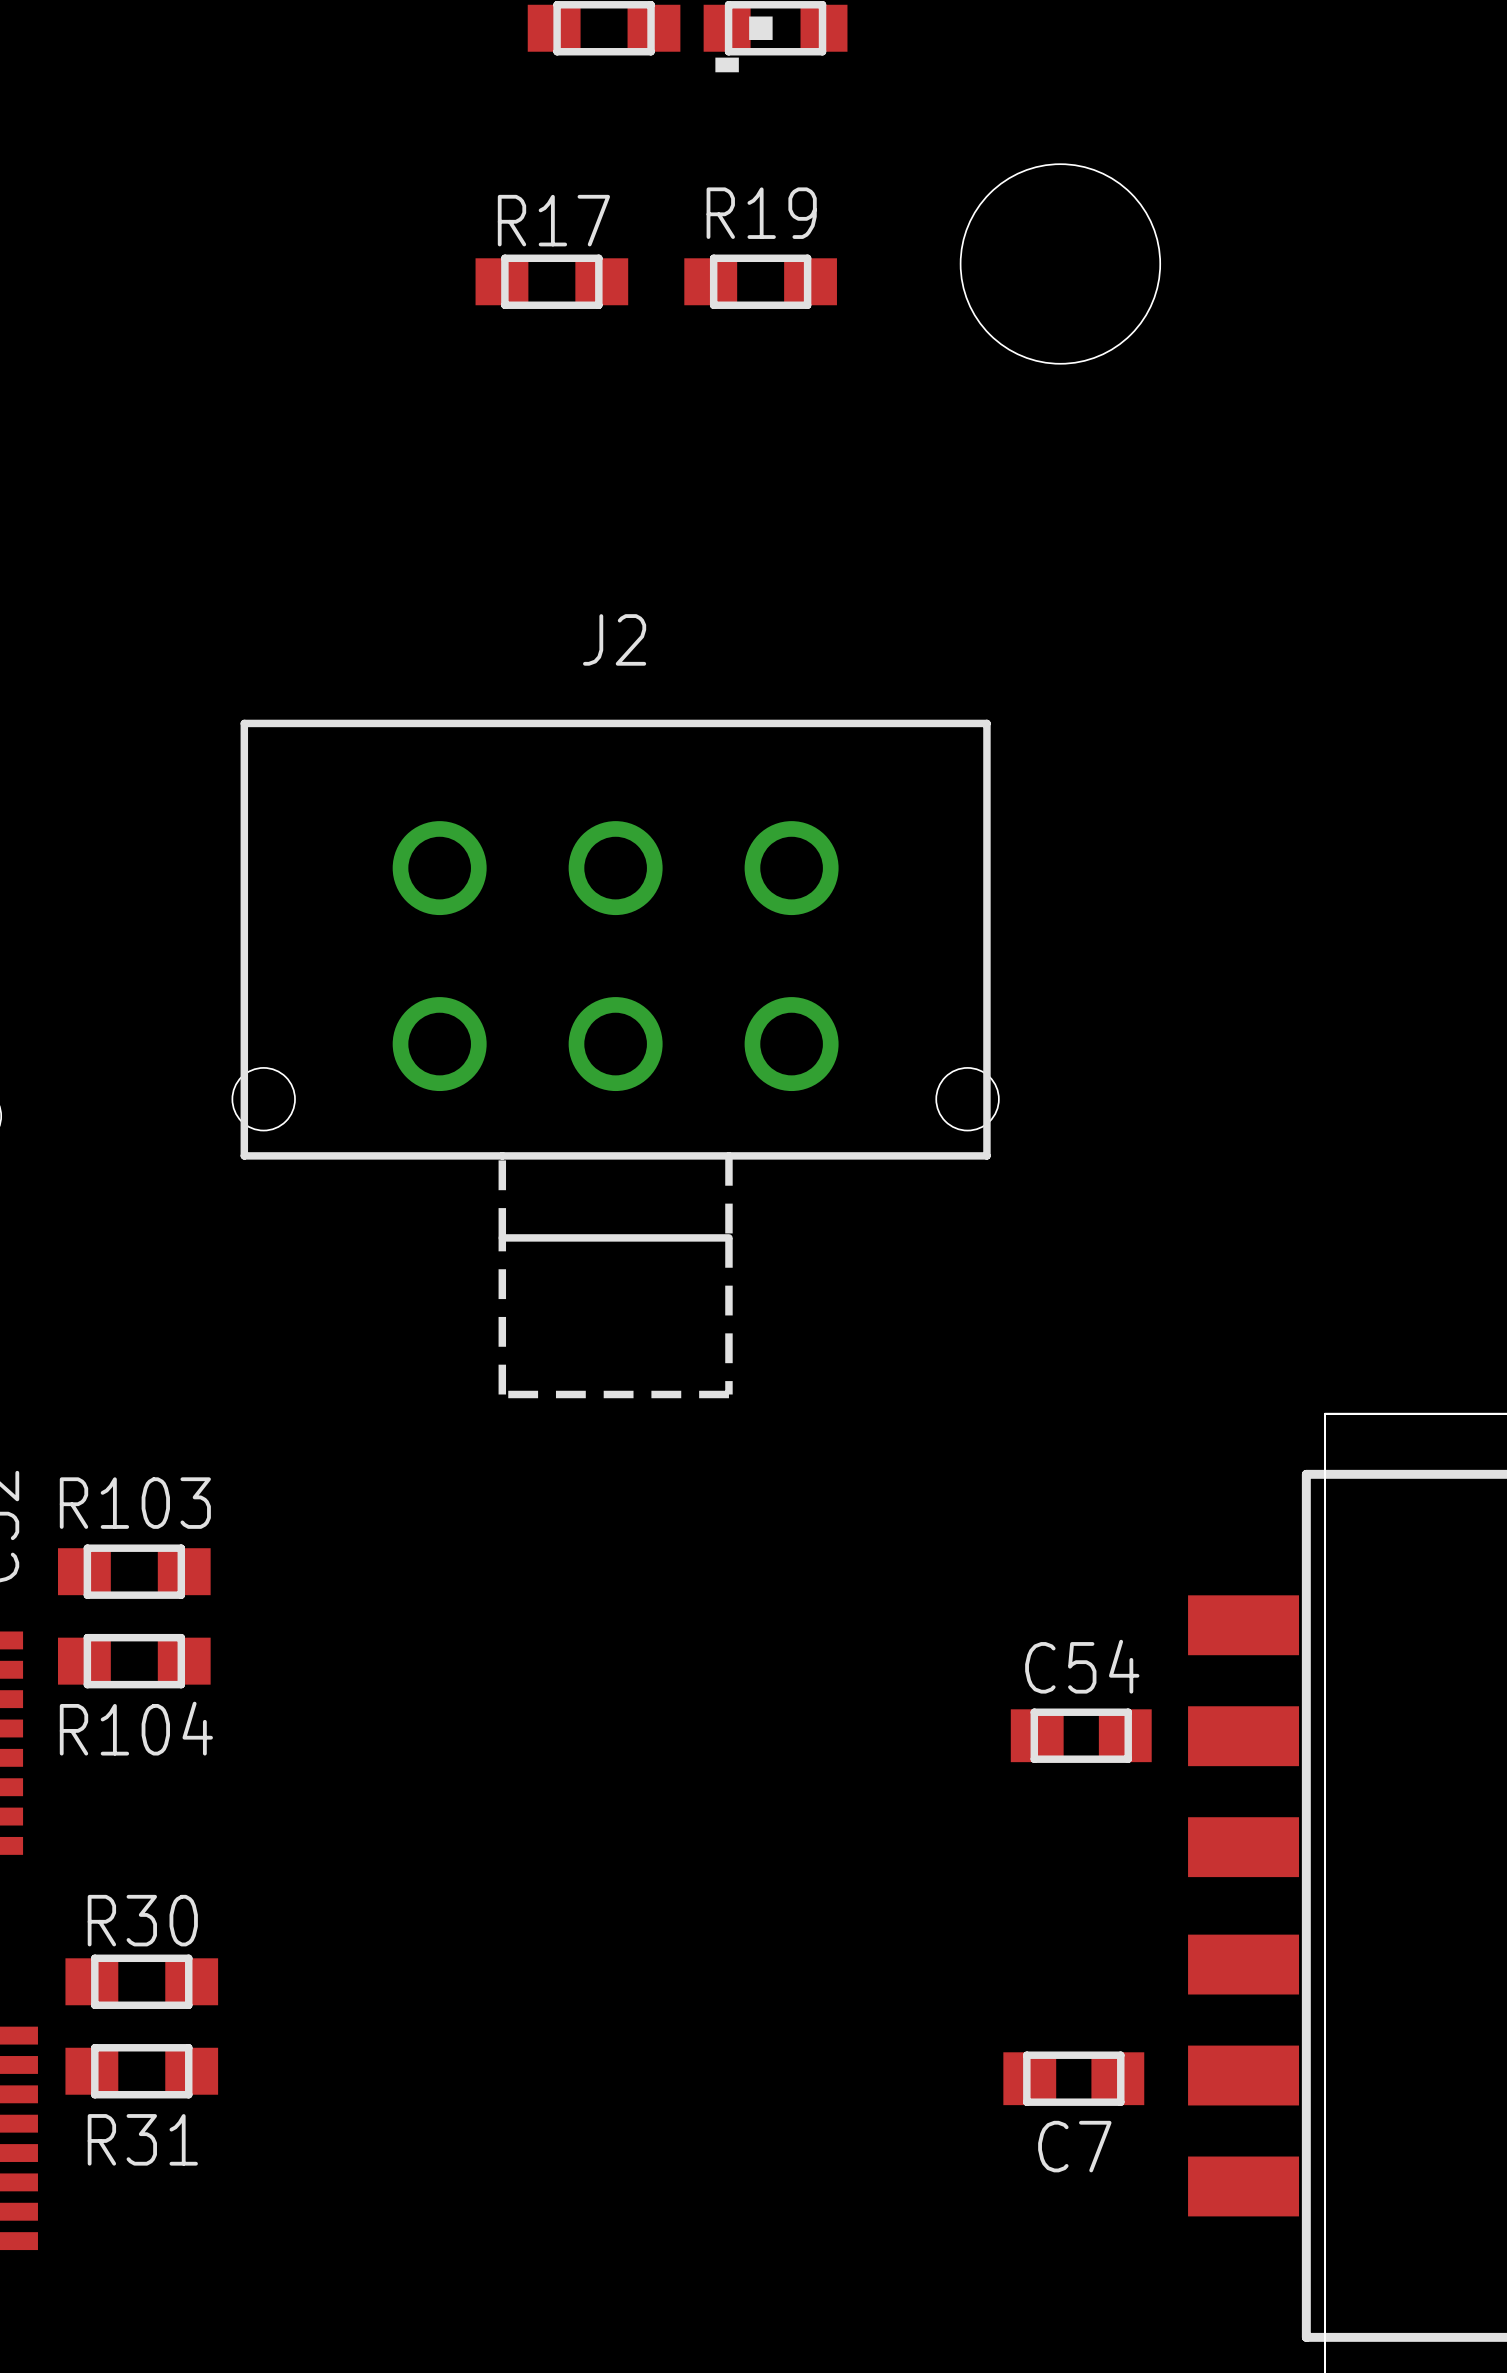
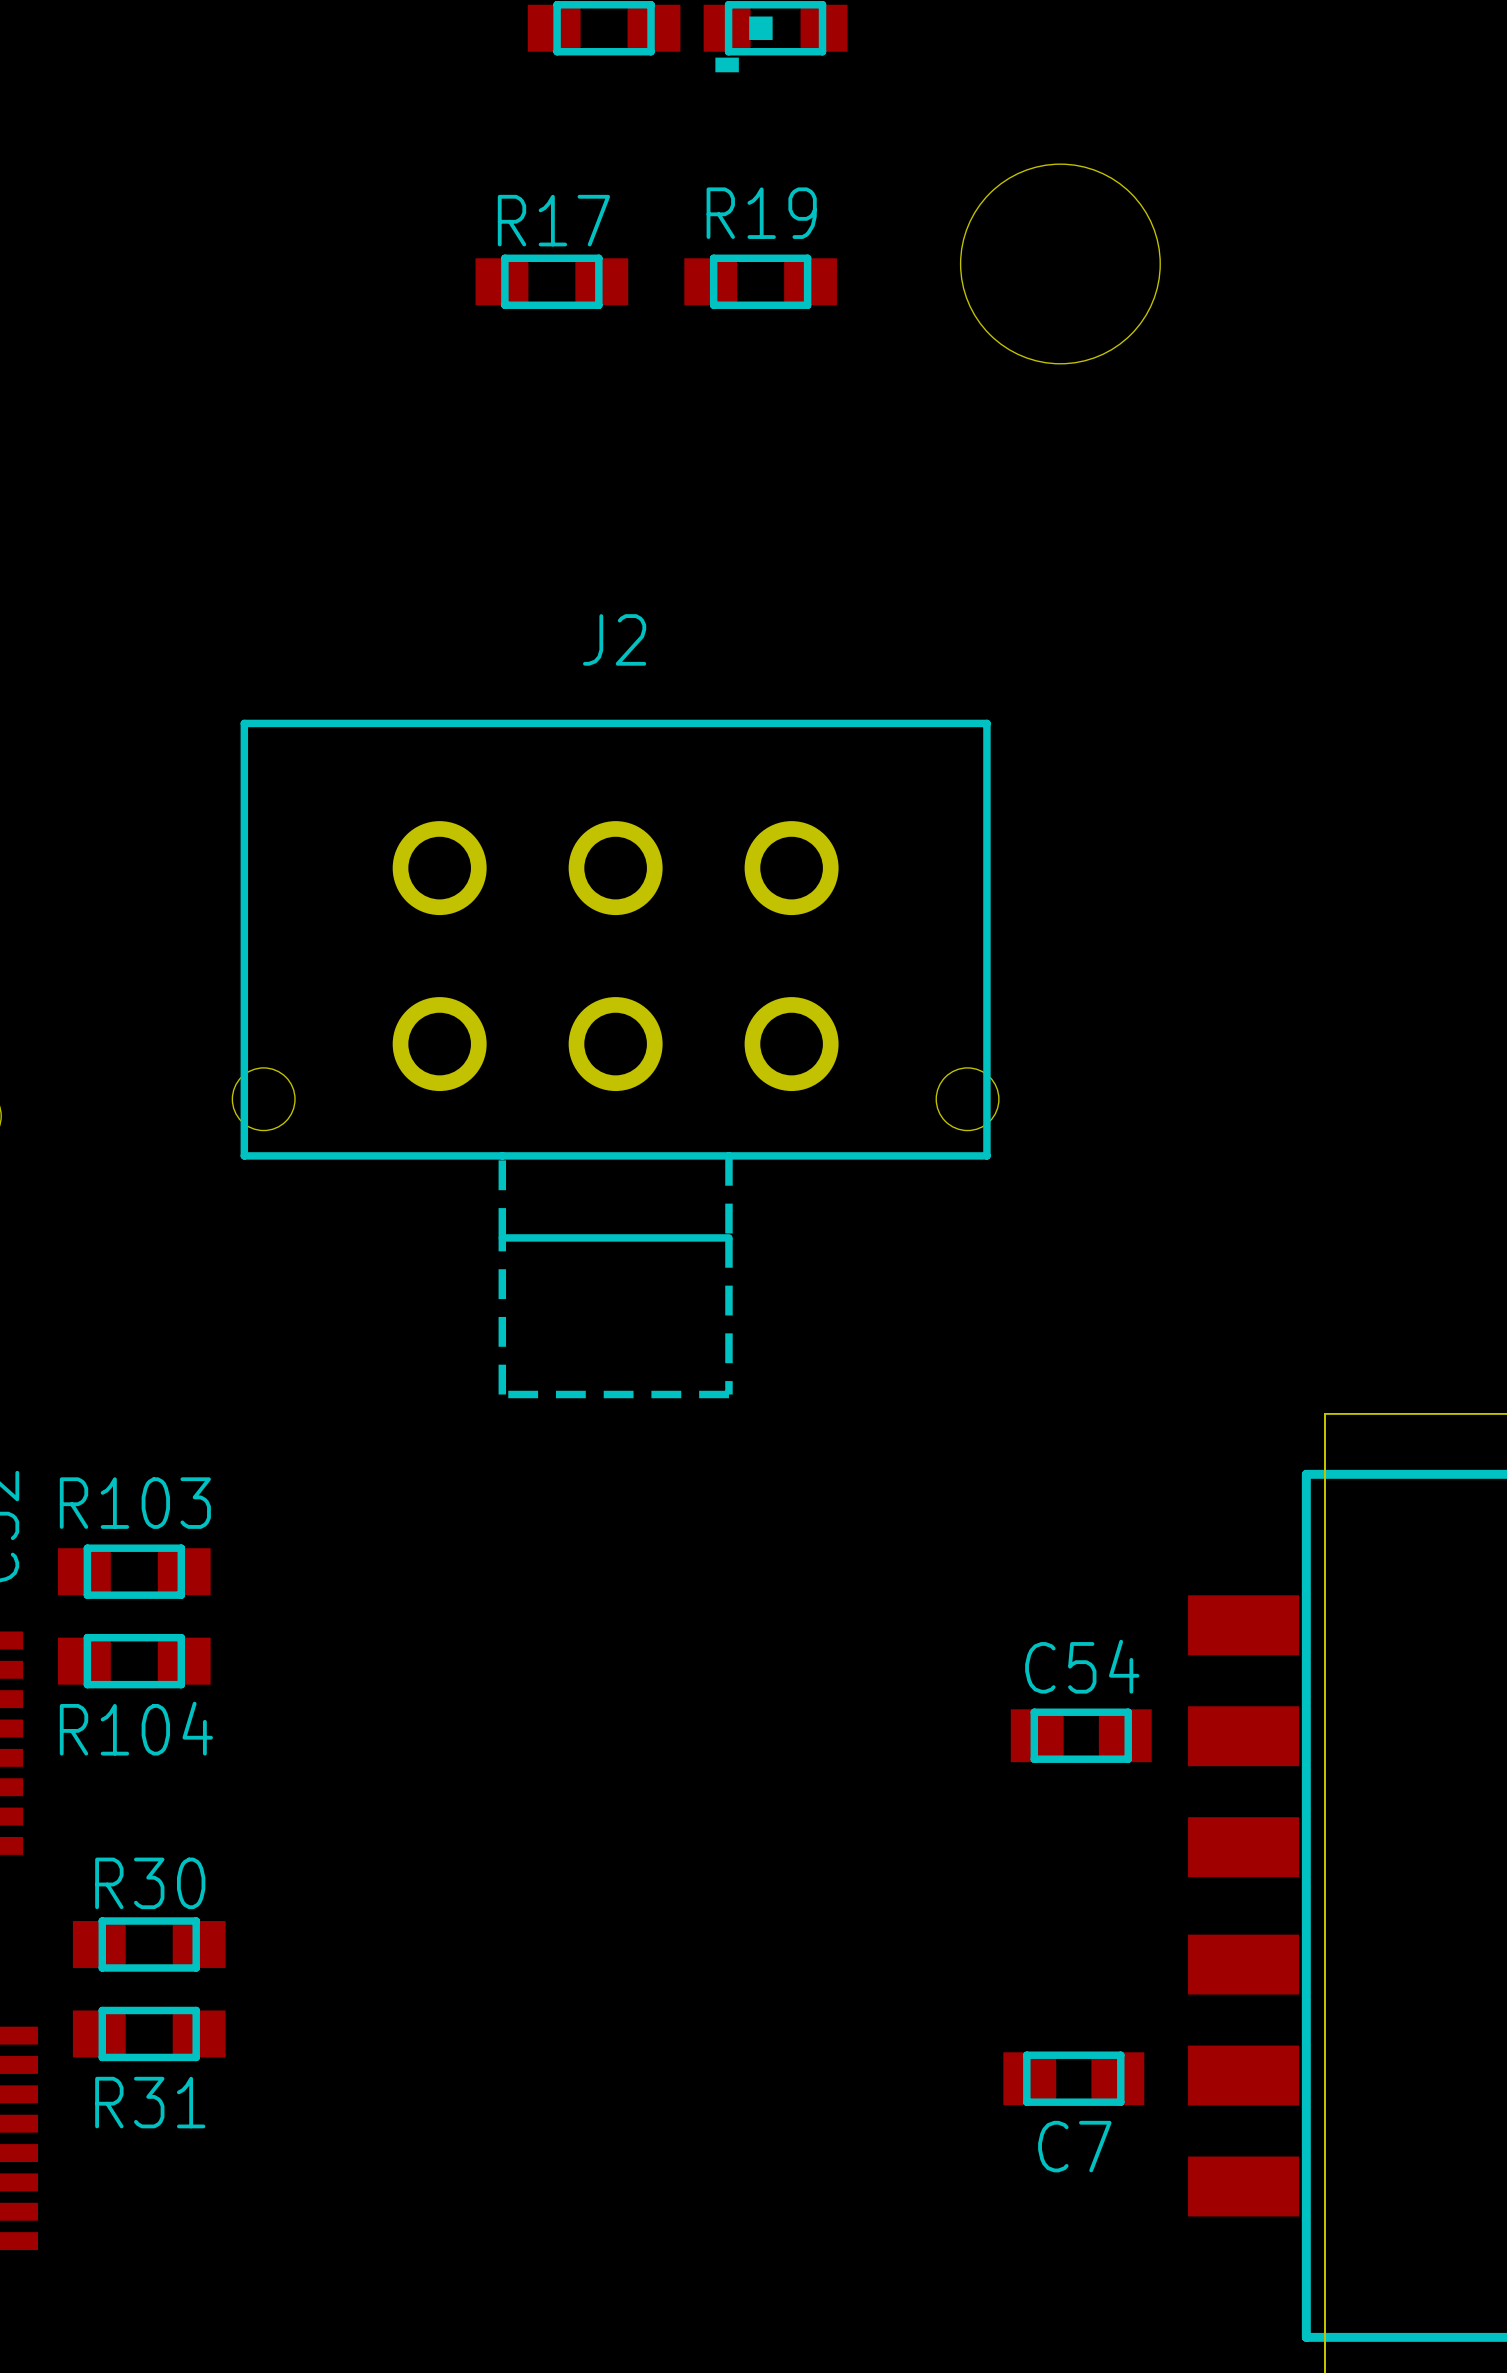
R30 position: (141, 1981) -> (149, 1944)
R31 position: (141, 2071) -> (149, 2033)

